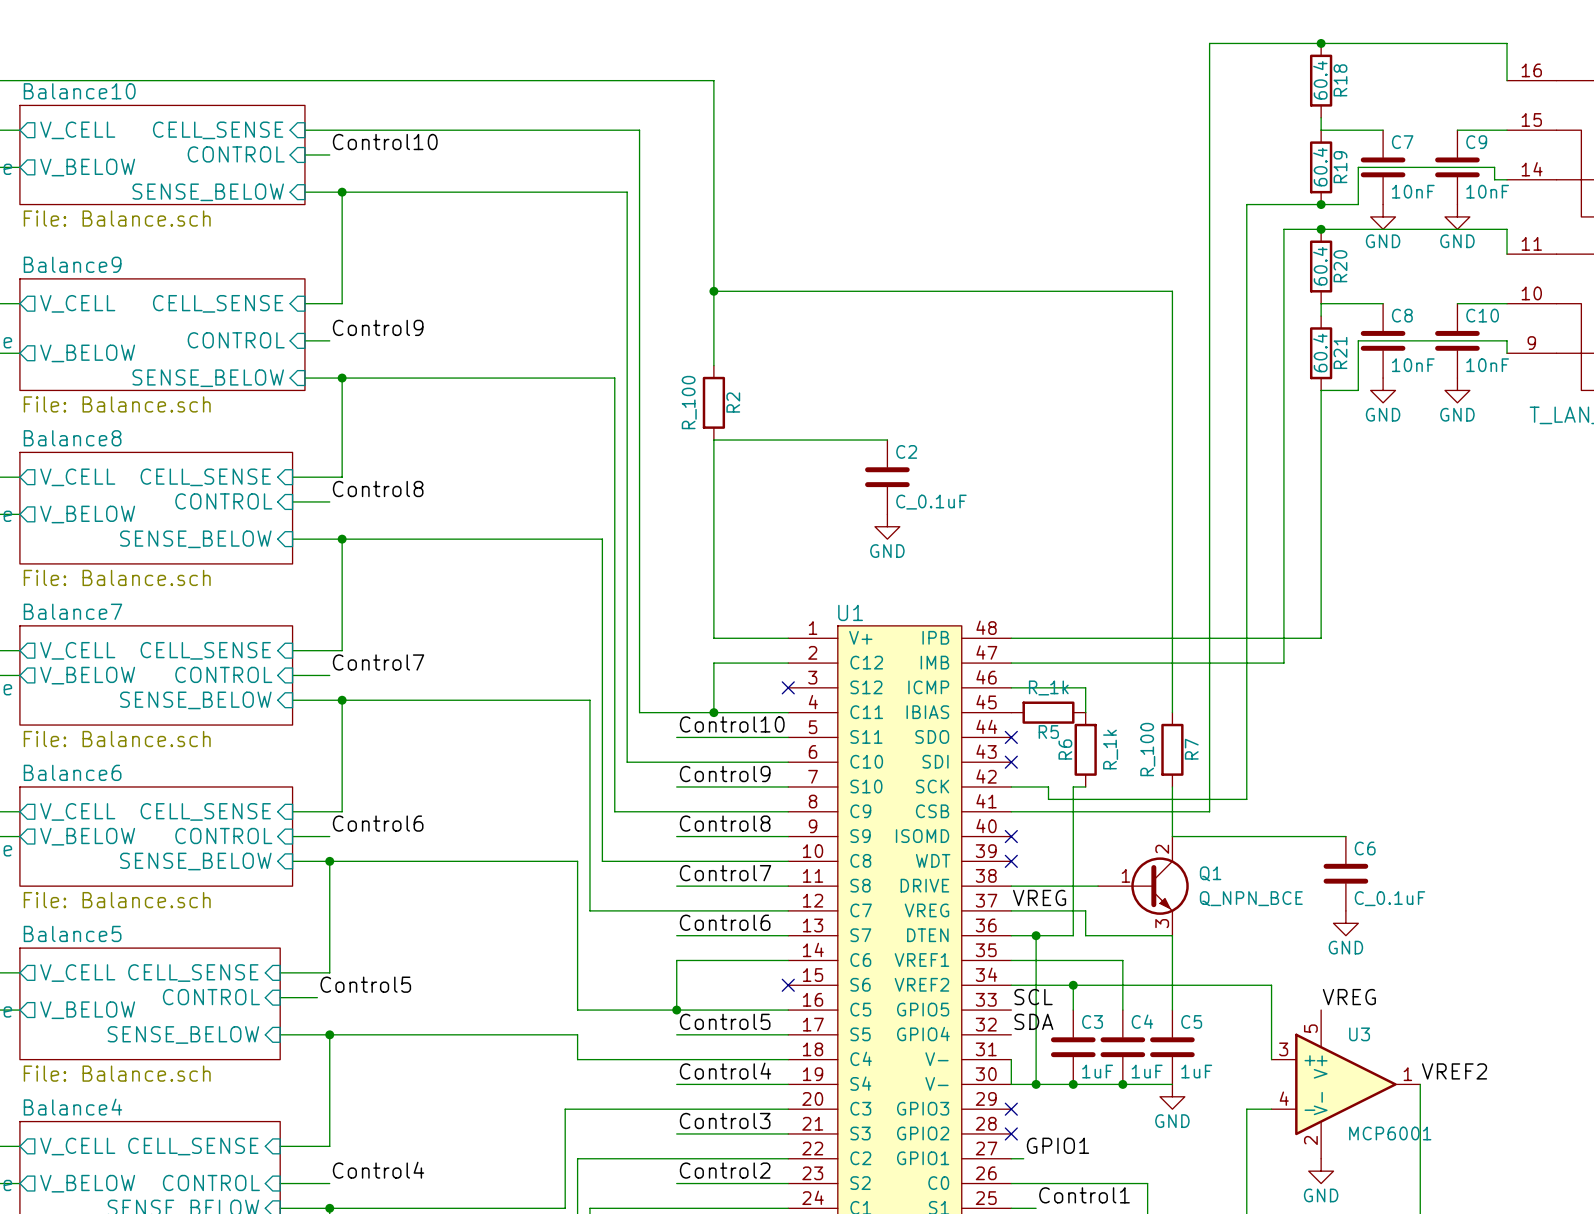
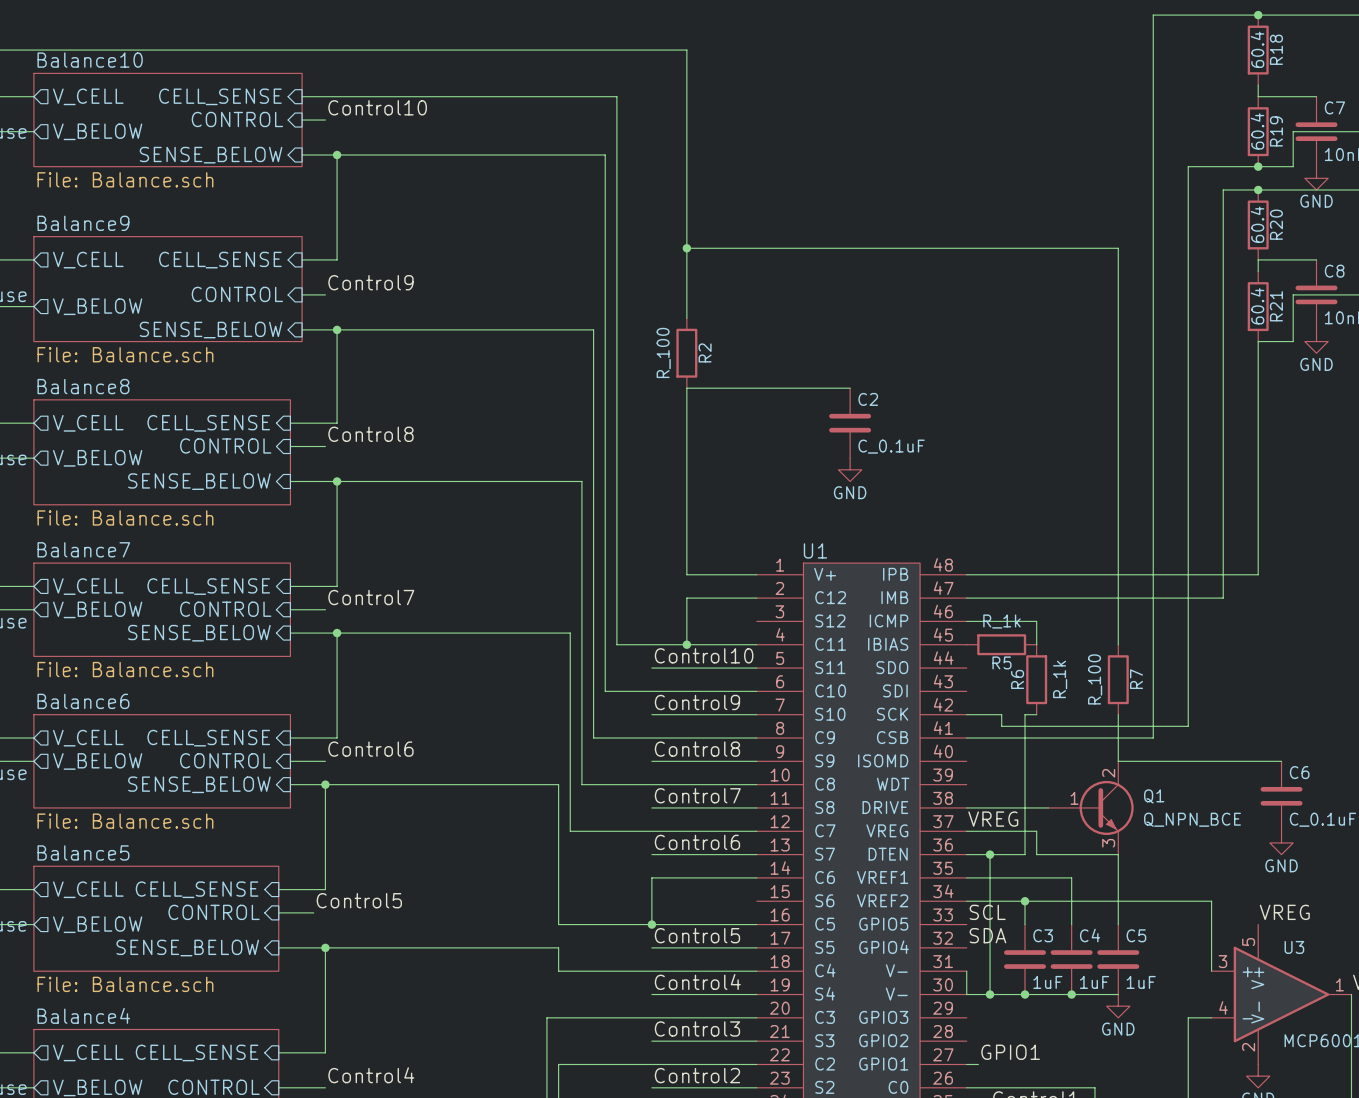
no-connect mark: (788, 687) -> none
no-connect mark: (1011, 737) -> none
no-connect mark: (1011, 762) -> none
no-connect mark: (1011, 836) -> none
no-connect mark: (1011, 861) -> none
no-connect mark: (788, 985) -> none
no-connect mark: (1011, 1109) -> none
no-connect mark: (1011, 1133) -> none

